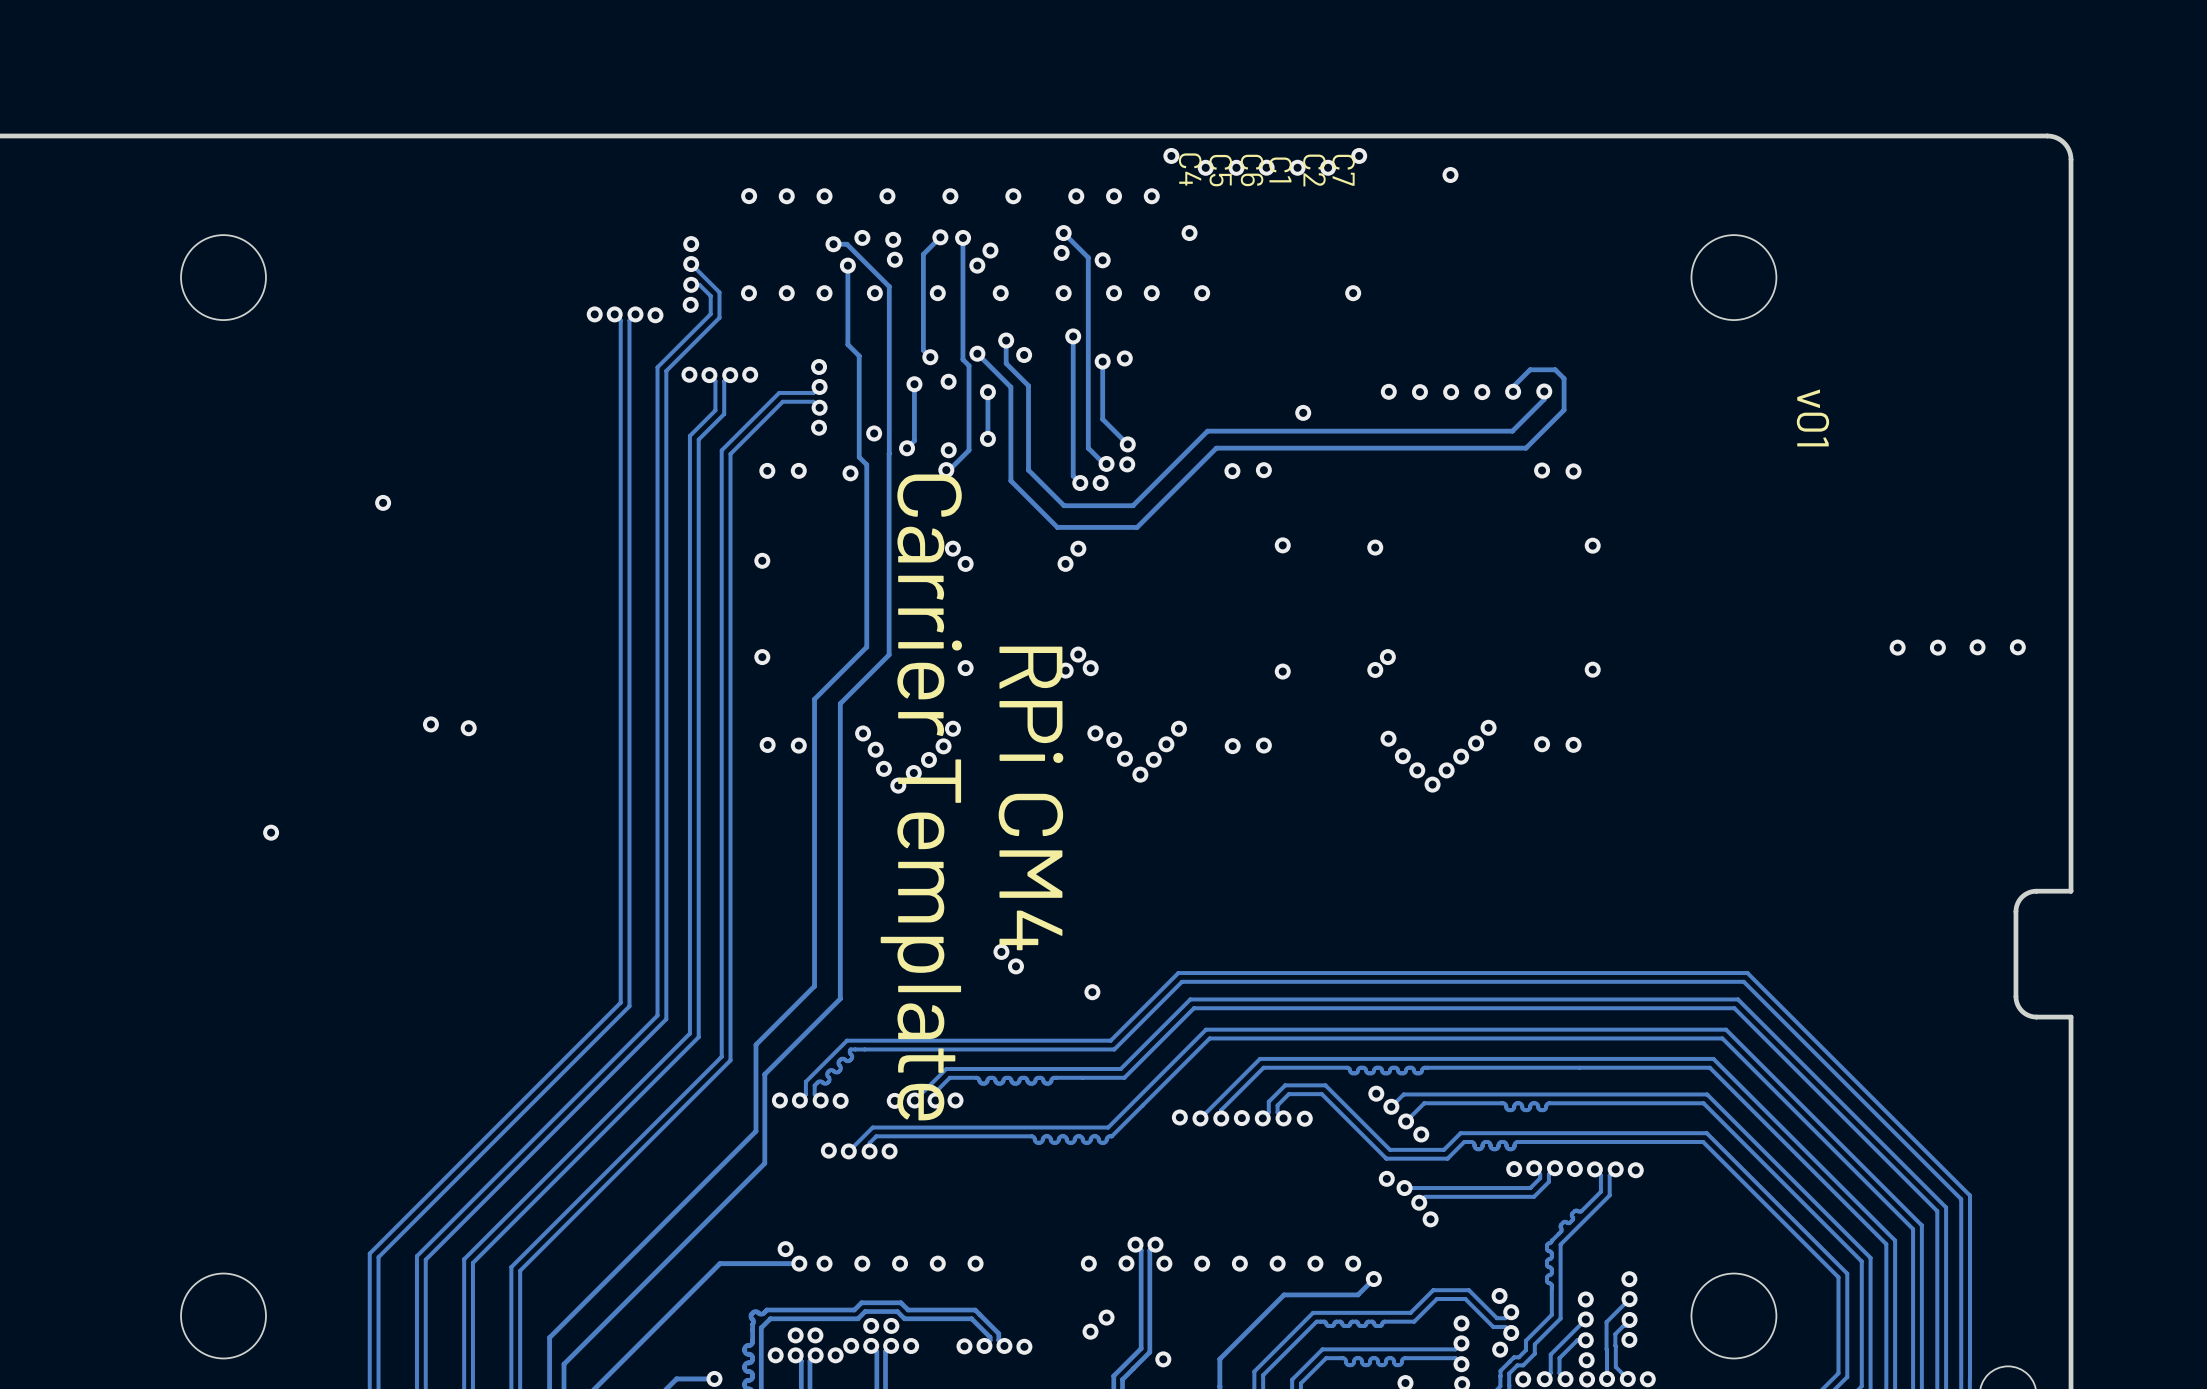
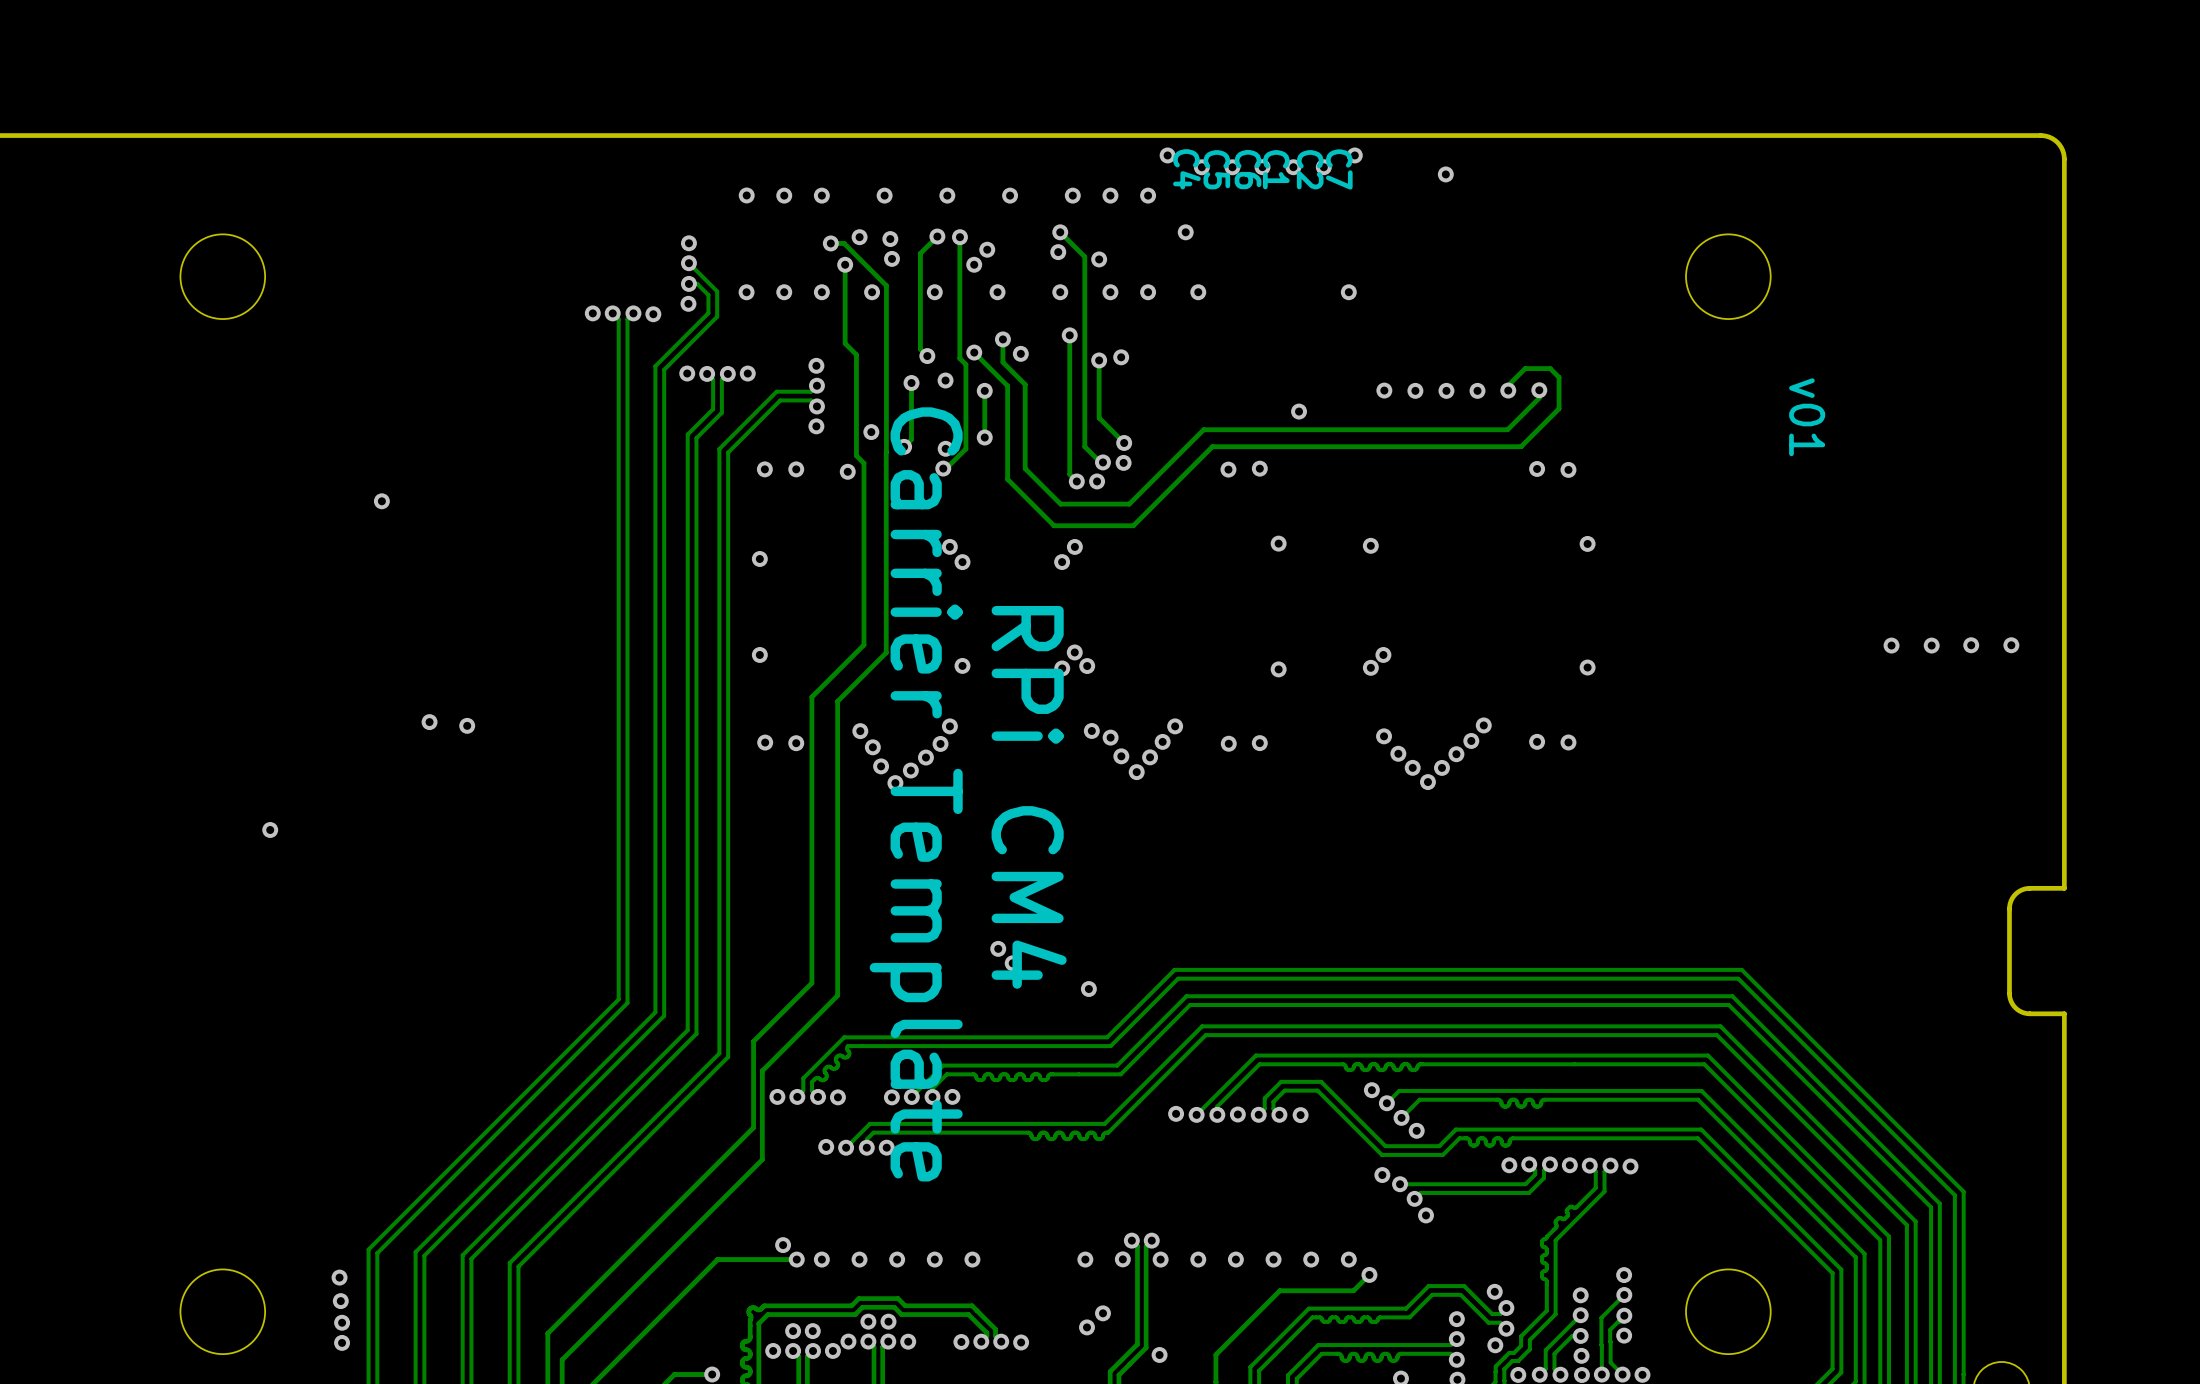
via: none -> (339, 1277)
via: none -> (340, 1301)
via: none -> (342, 1322)
via: none -> (342, 1342)

